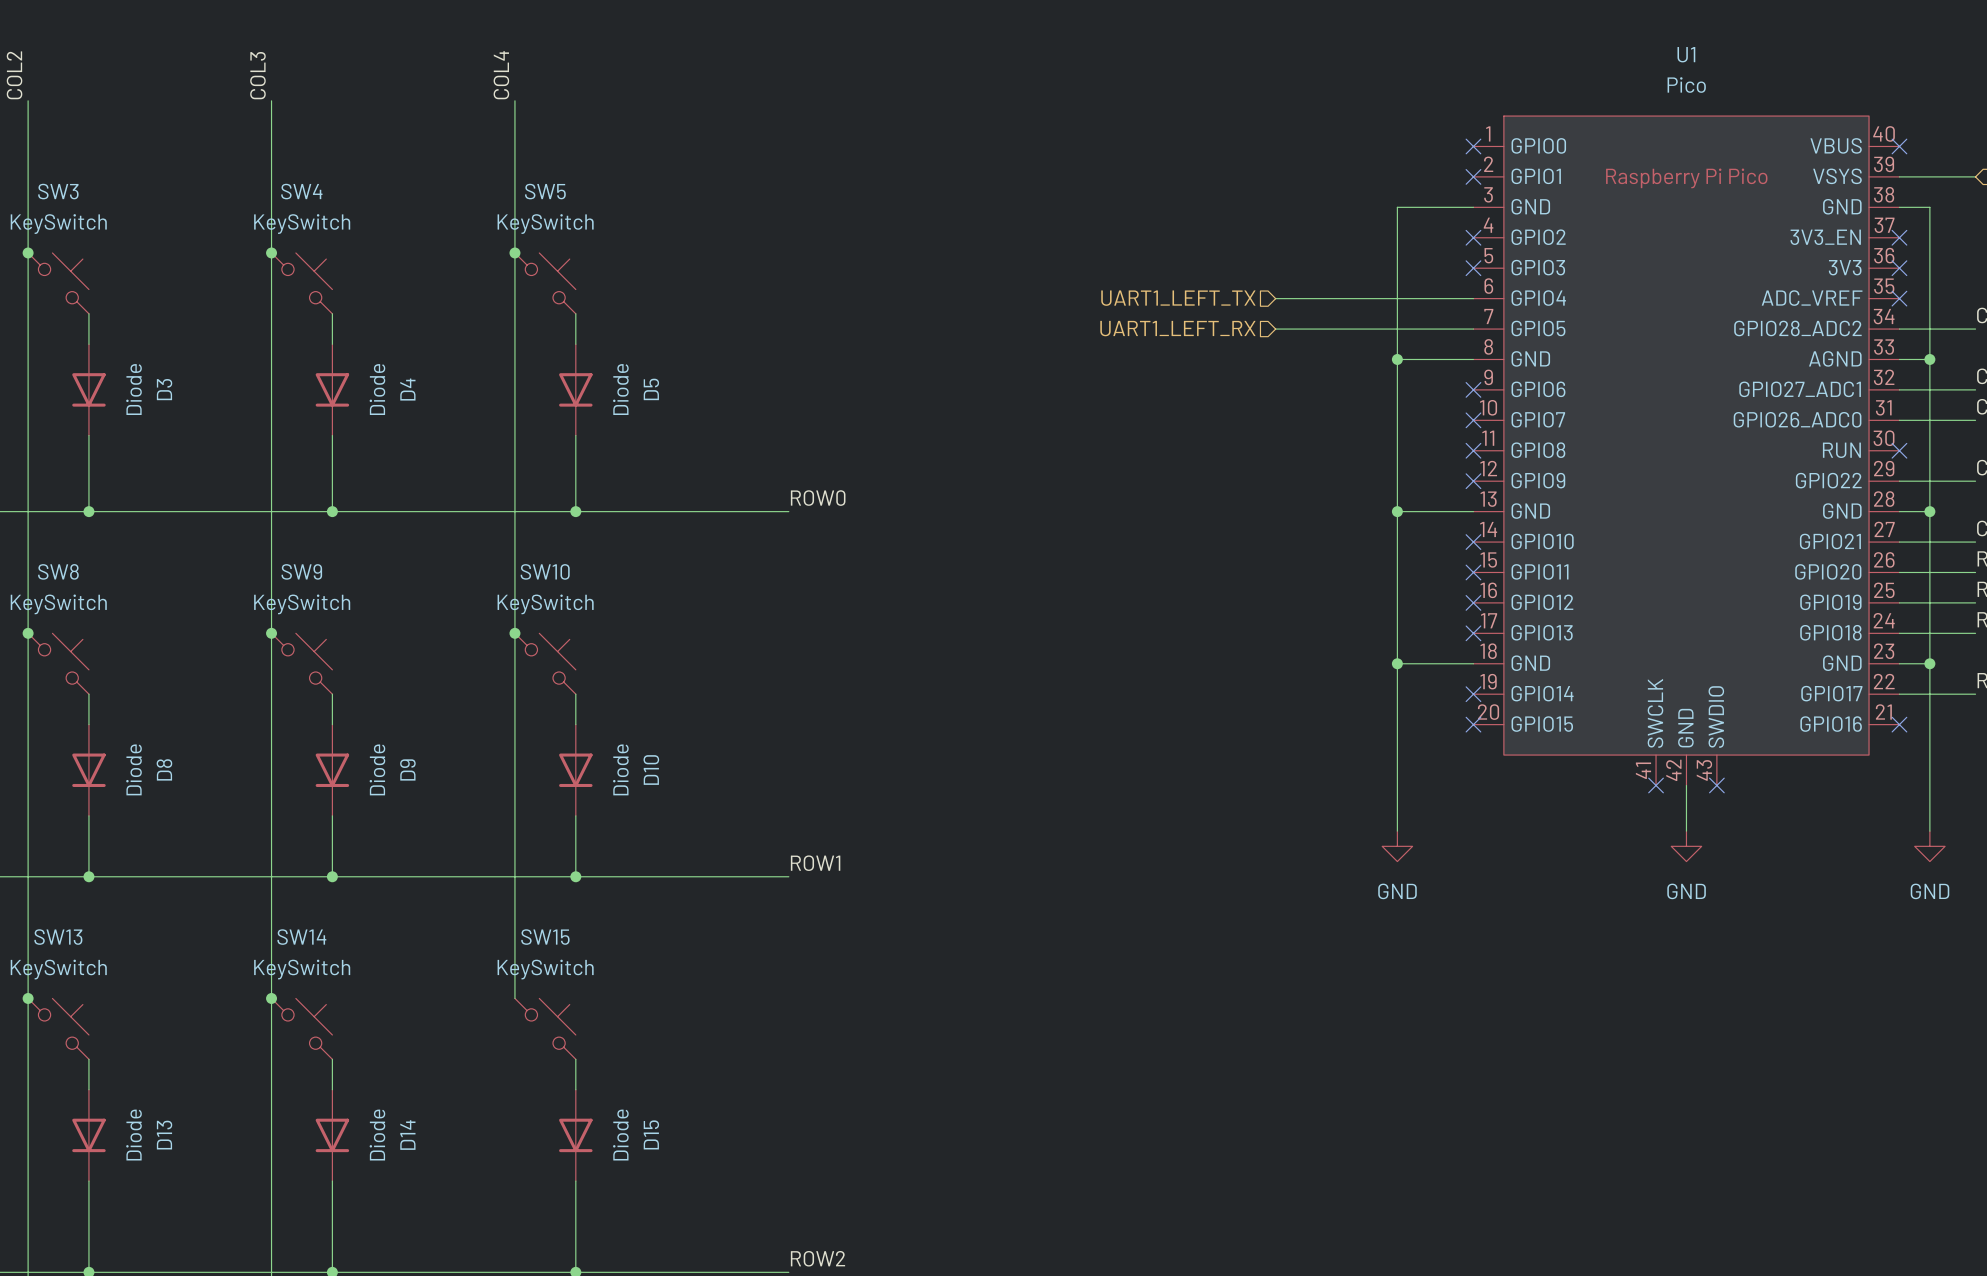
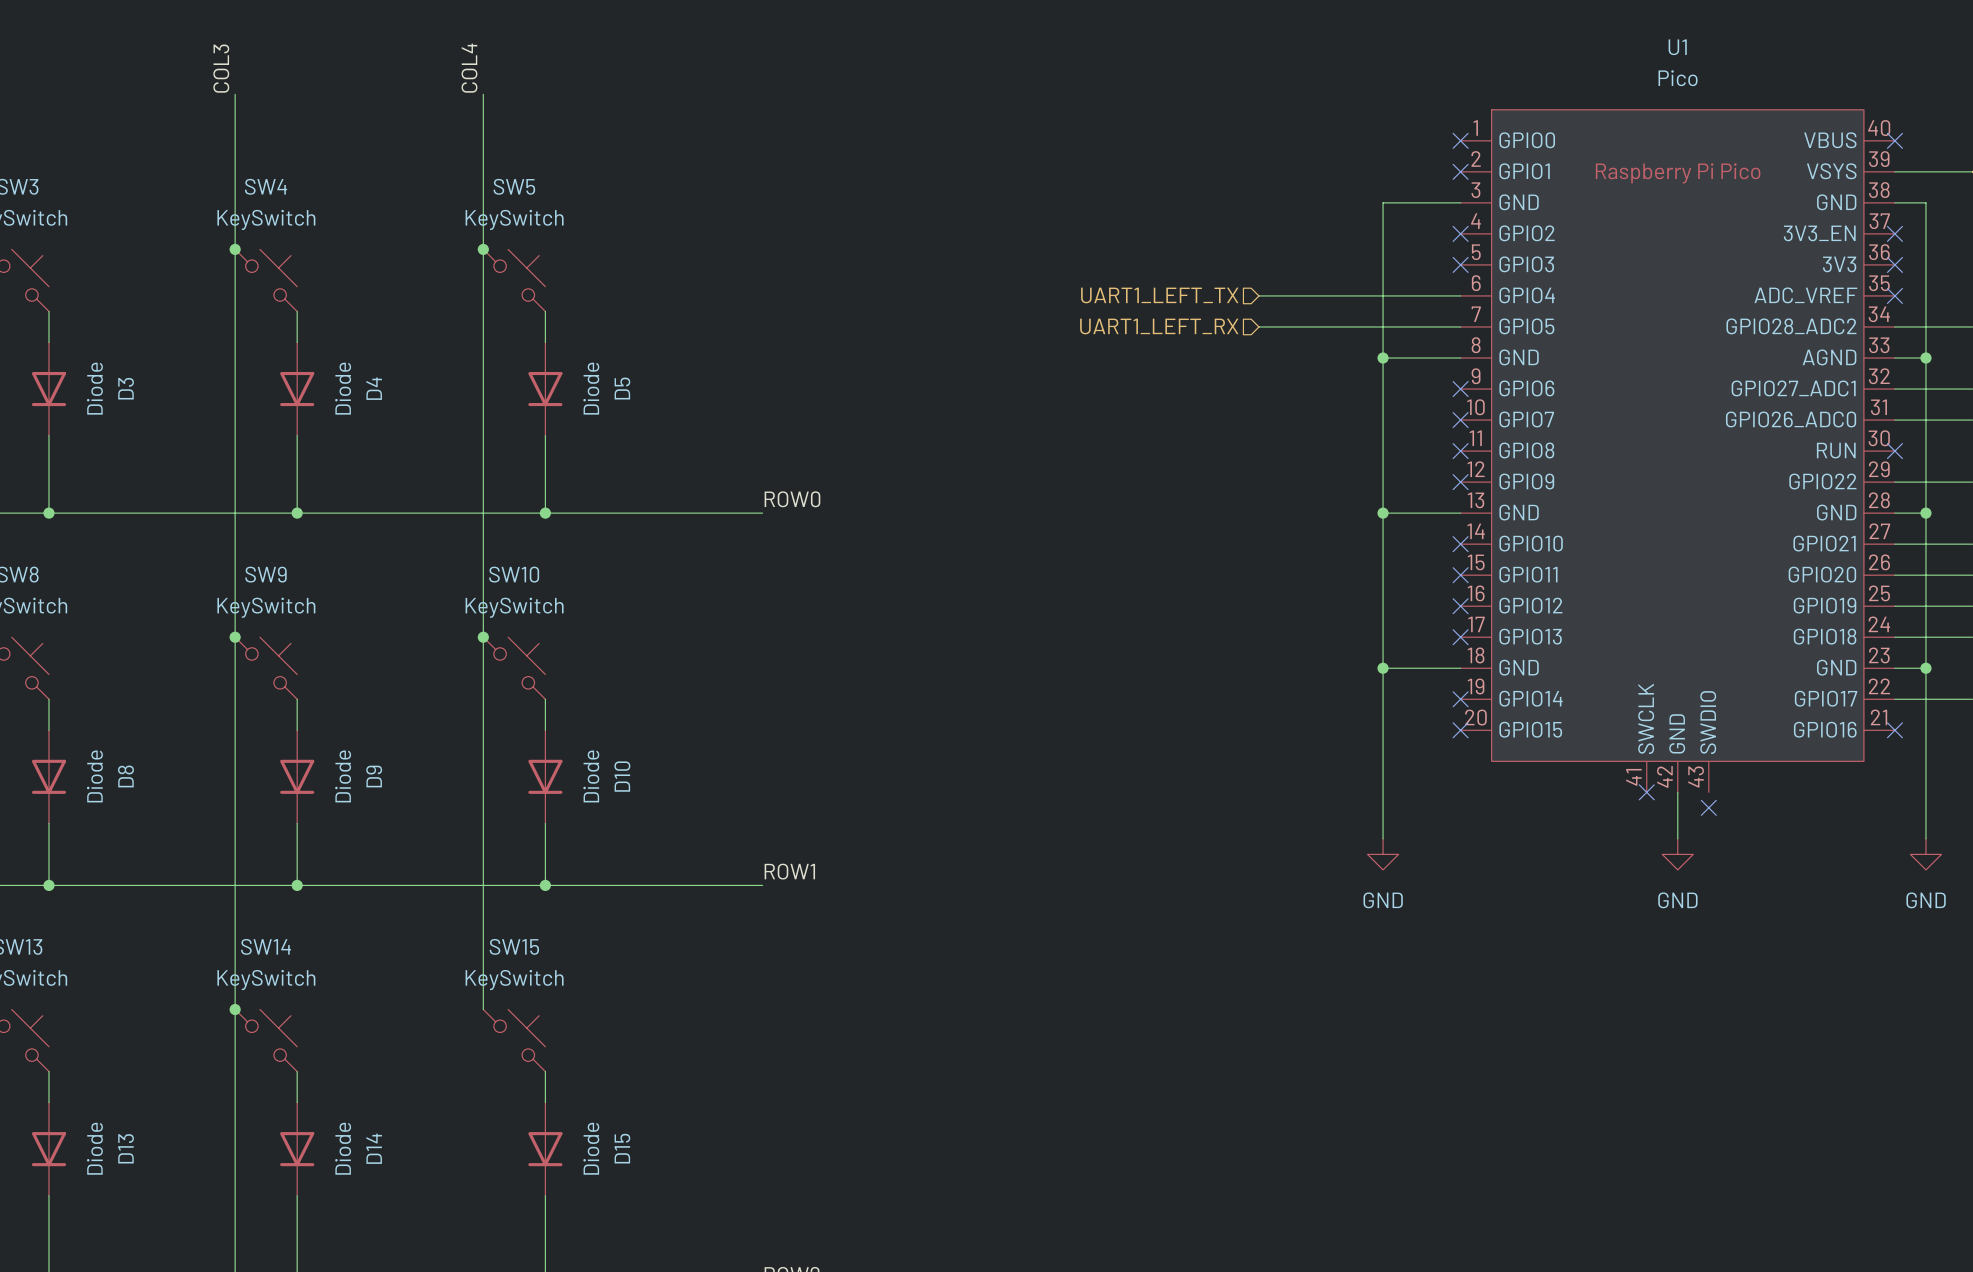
no-connect mark position: (1716, 785) -> (1708, 807)

